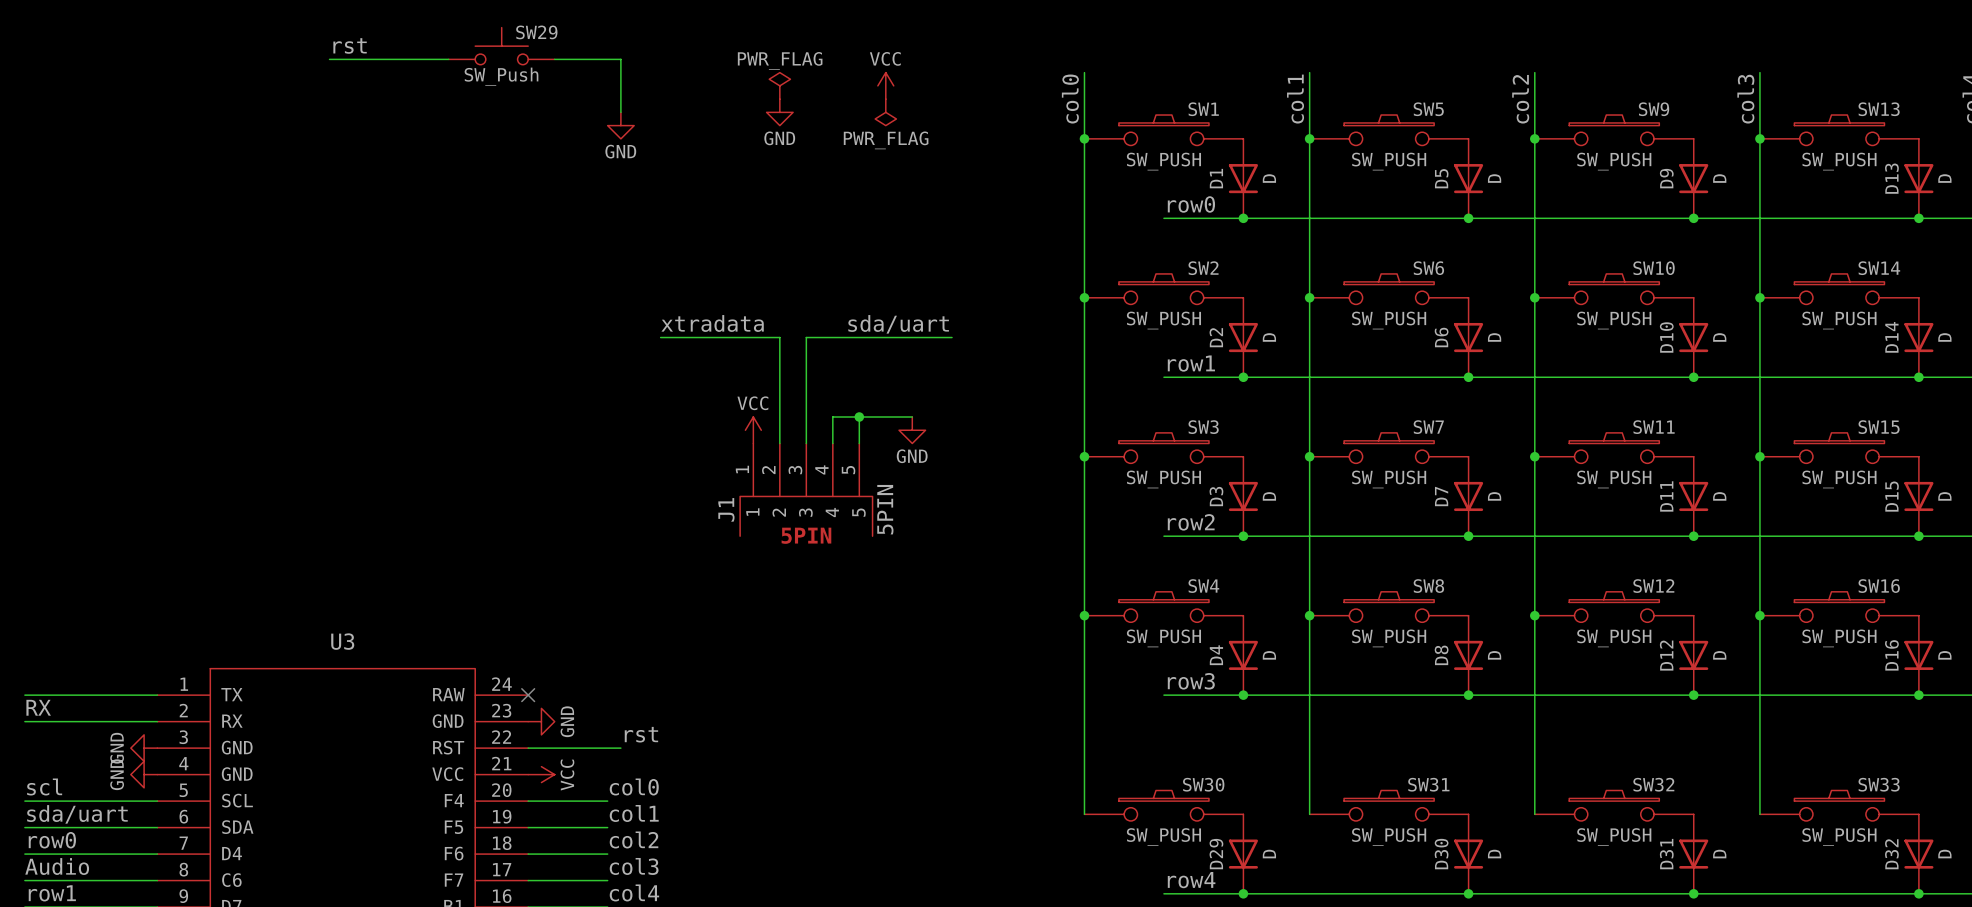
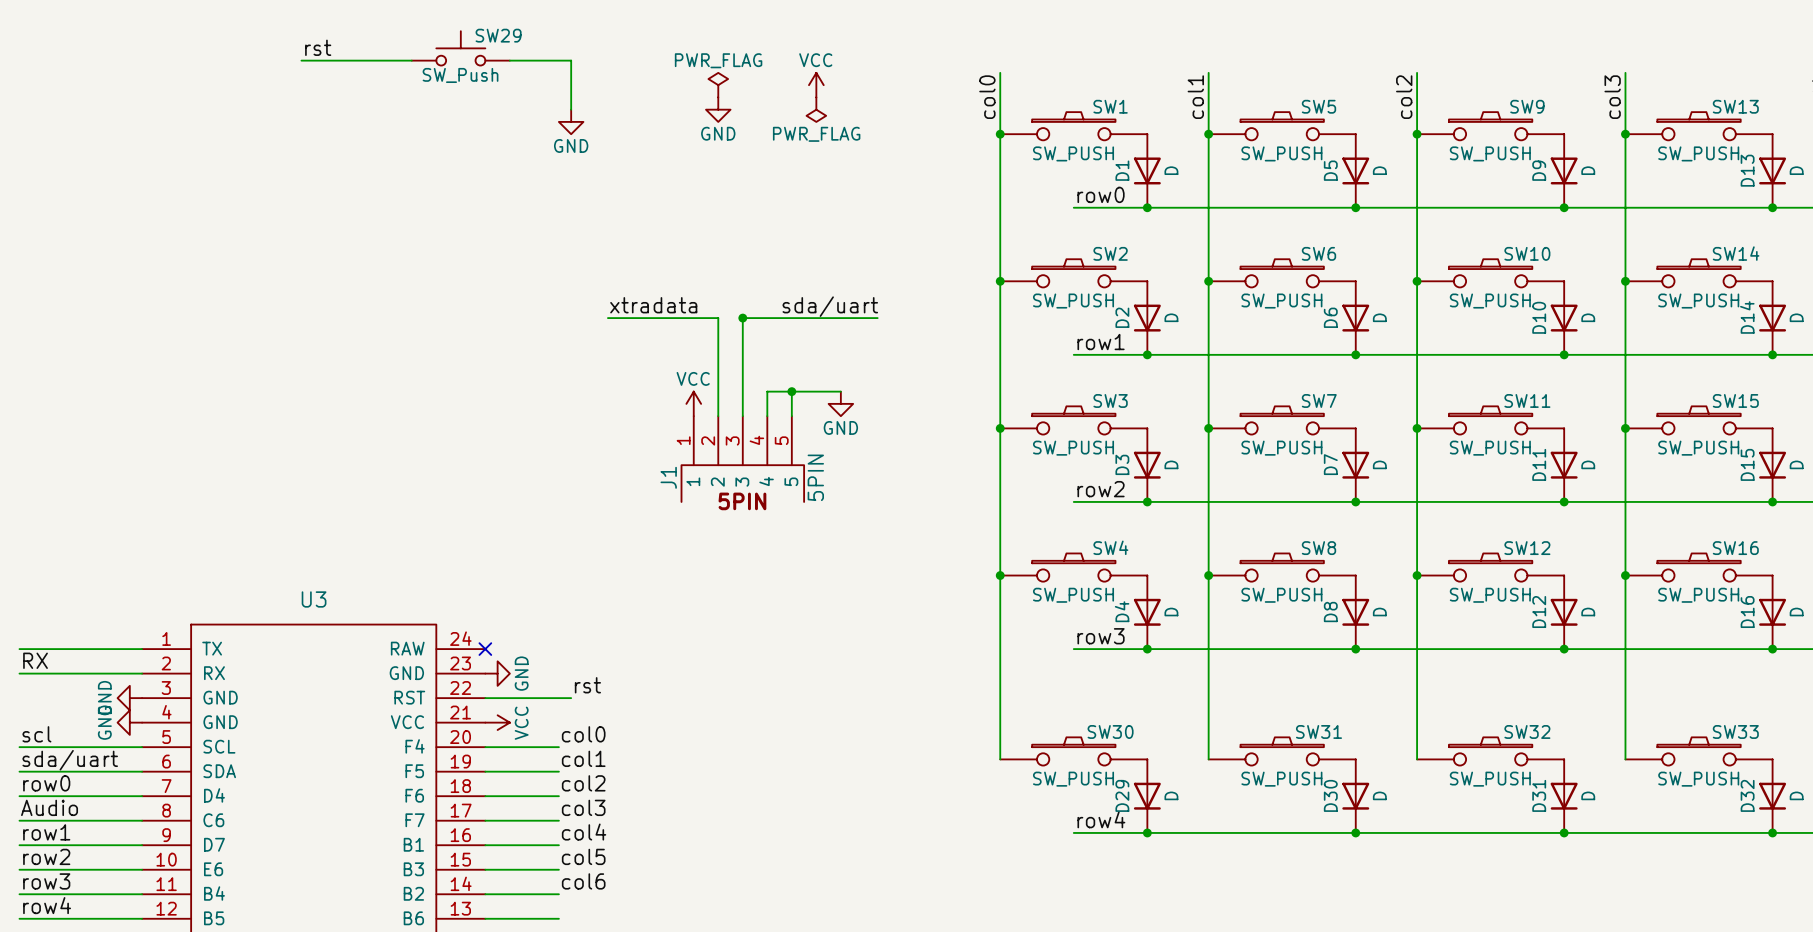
junction: none -> (742, 318)

